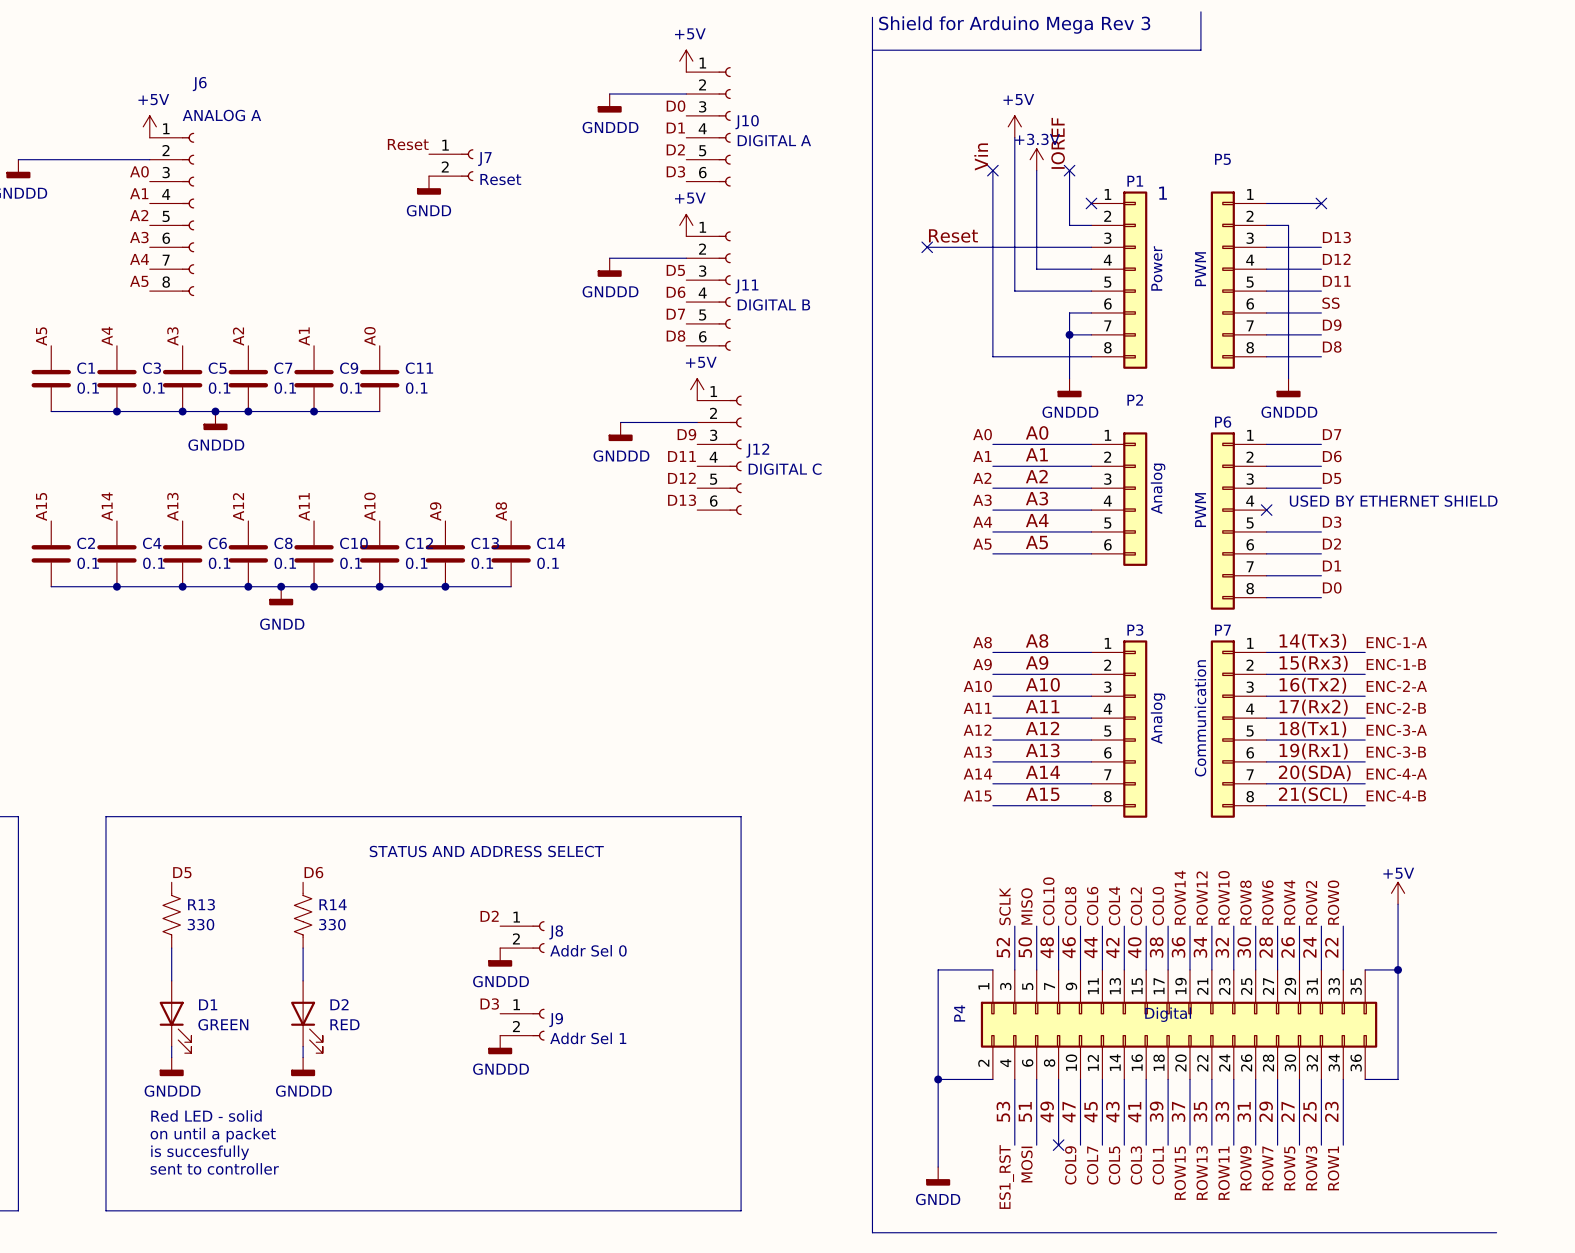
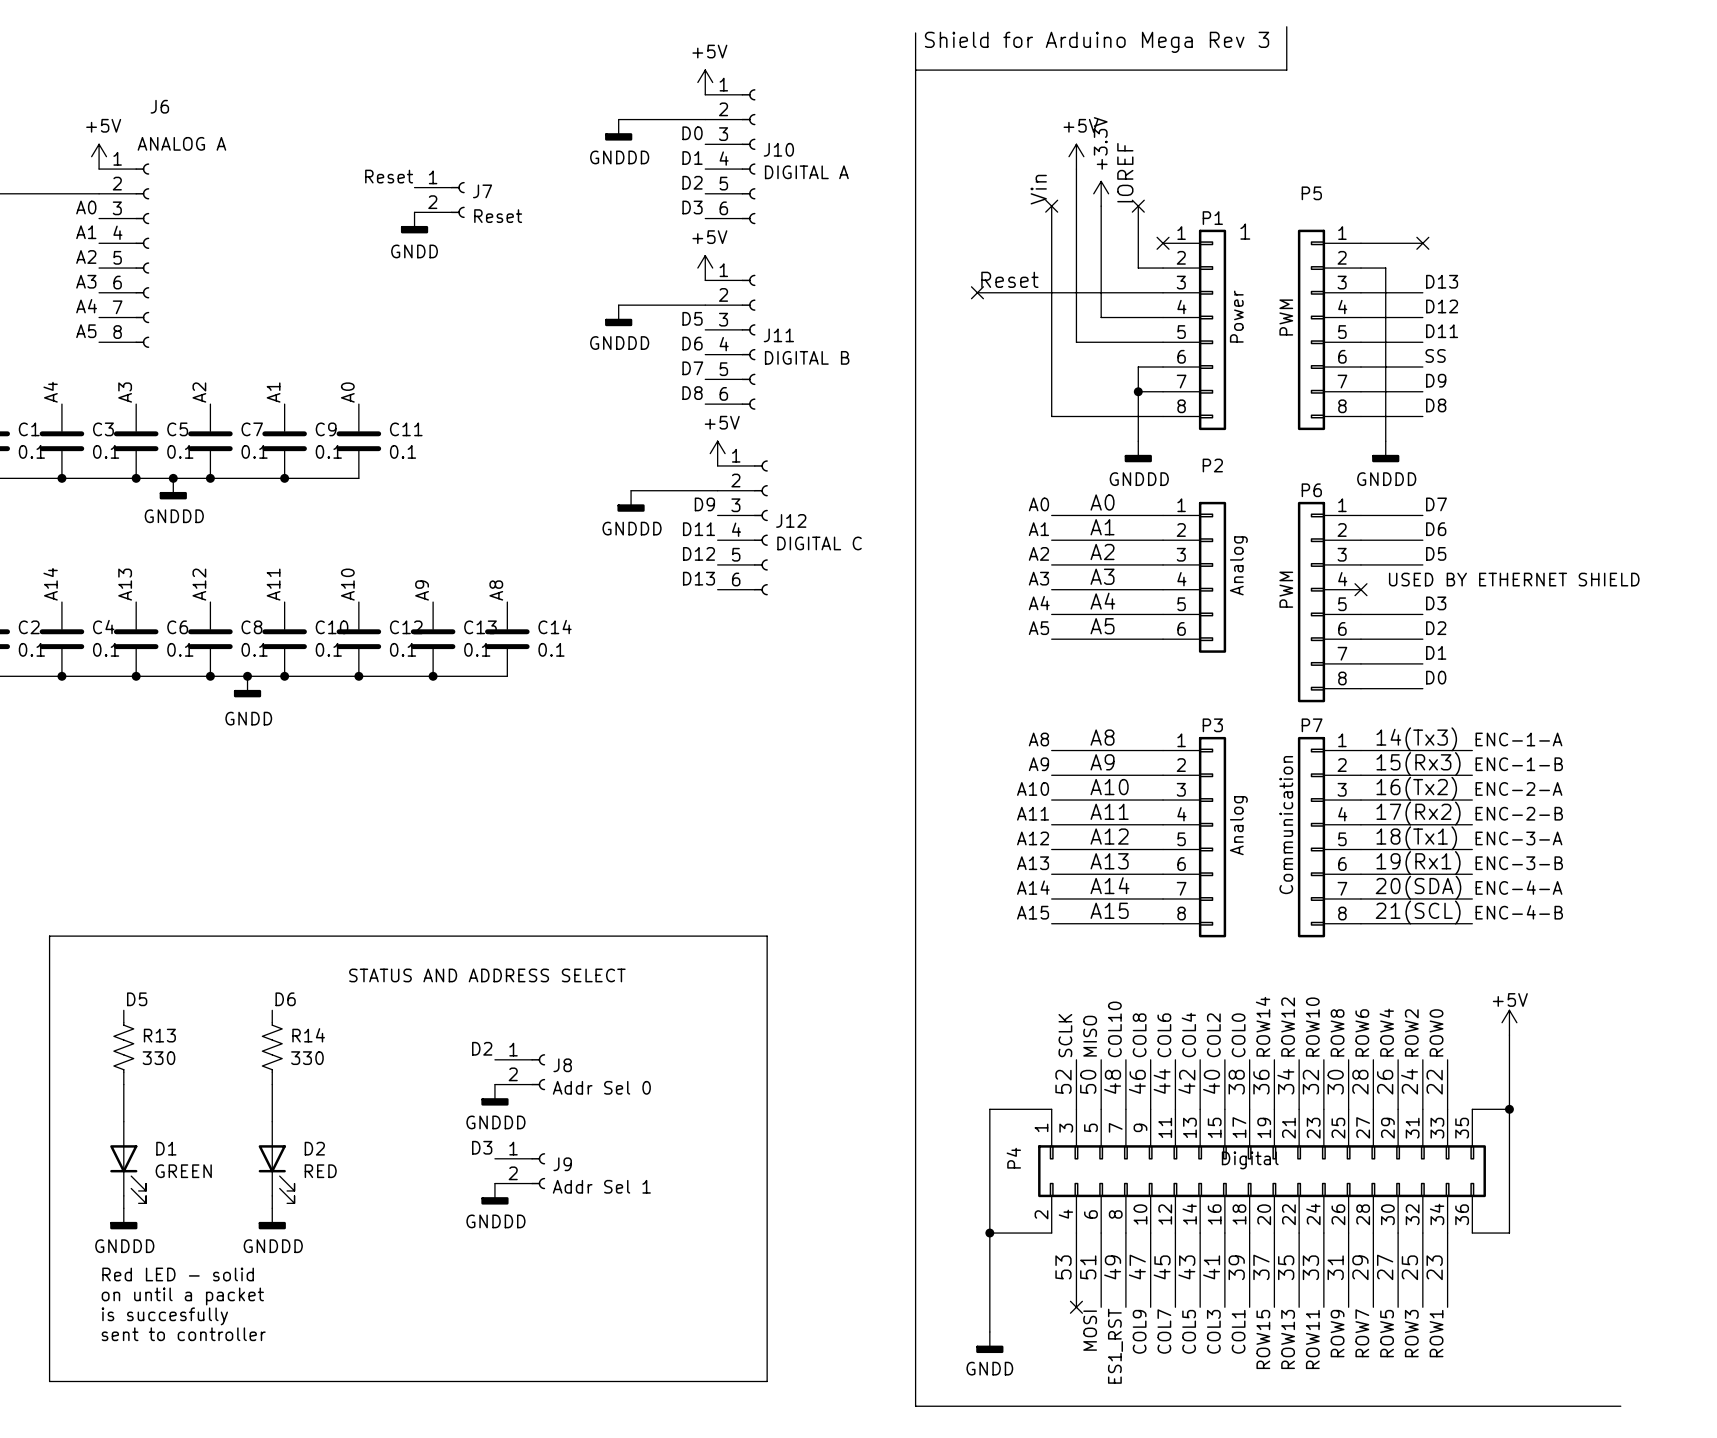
power symbol text rotation: 0° (1037, 139) -> 90° counterclockwise (1100, 143)
no-connect mark position: (1058, 1145) -> (1076, 1307)
label position: ES1_RST (1006, 1177) -> ES1_RST (1115, 1346)

